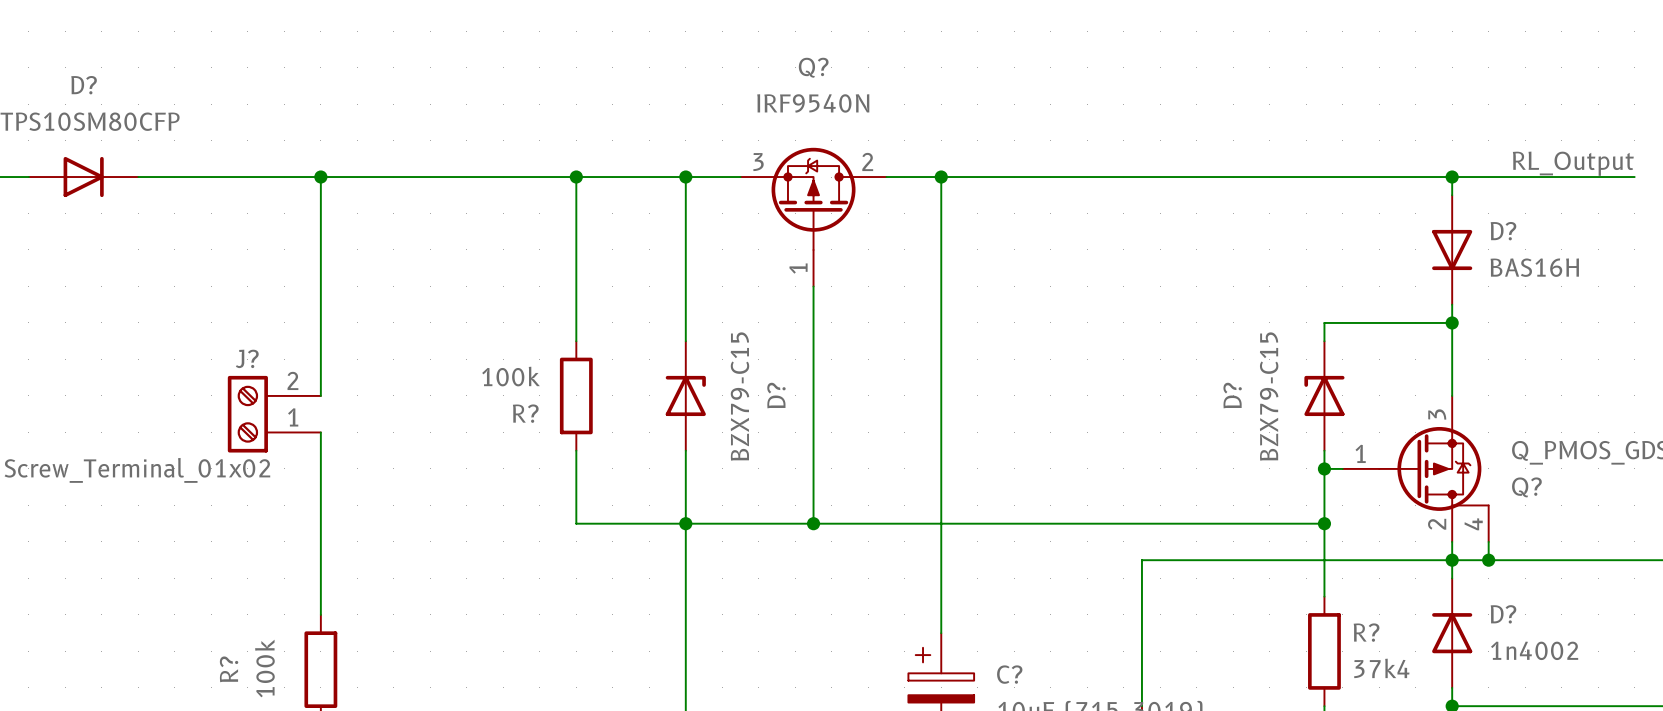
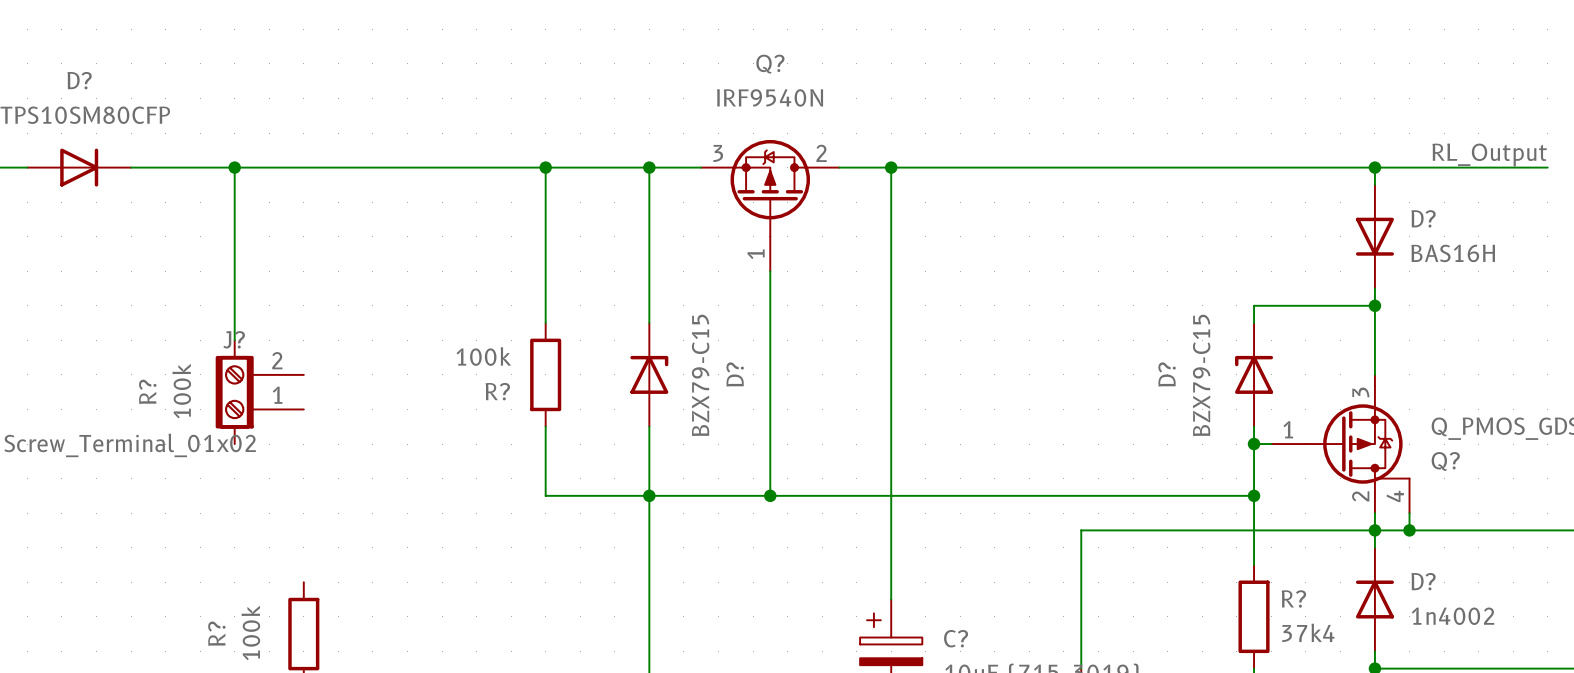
wire: (320, 177) (320, 395) -> none
junction position: (320, 177) -> (234, 167)
R?: none -> 100k (234, 392)
wire: (320, 432) (320, 614) -> (234, 167) (234, 340)

